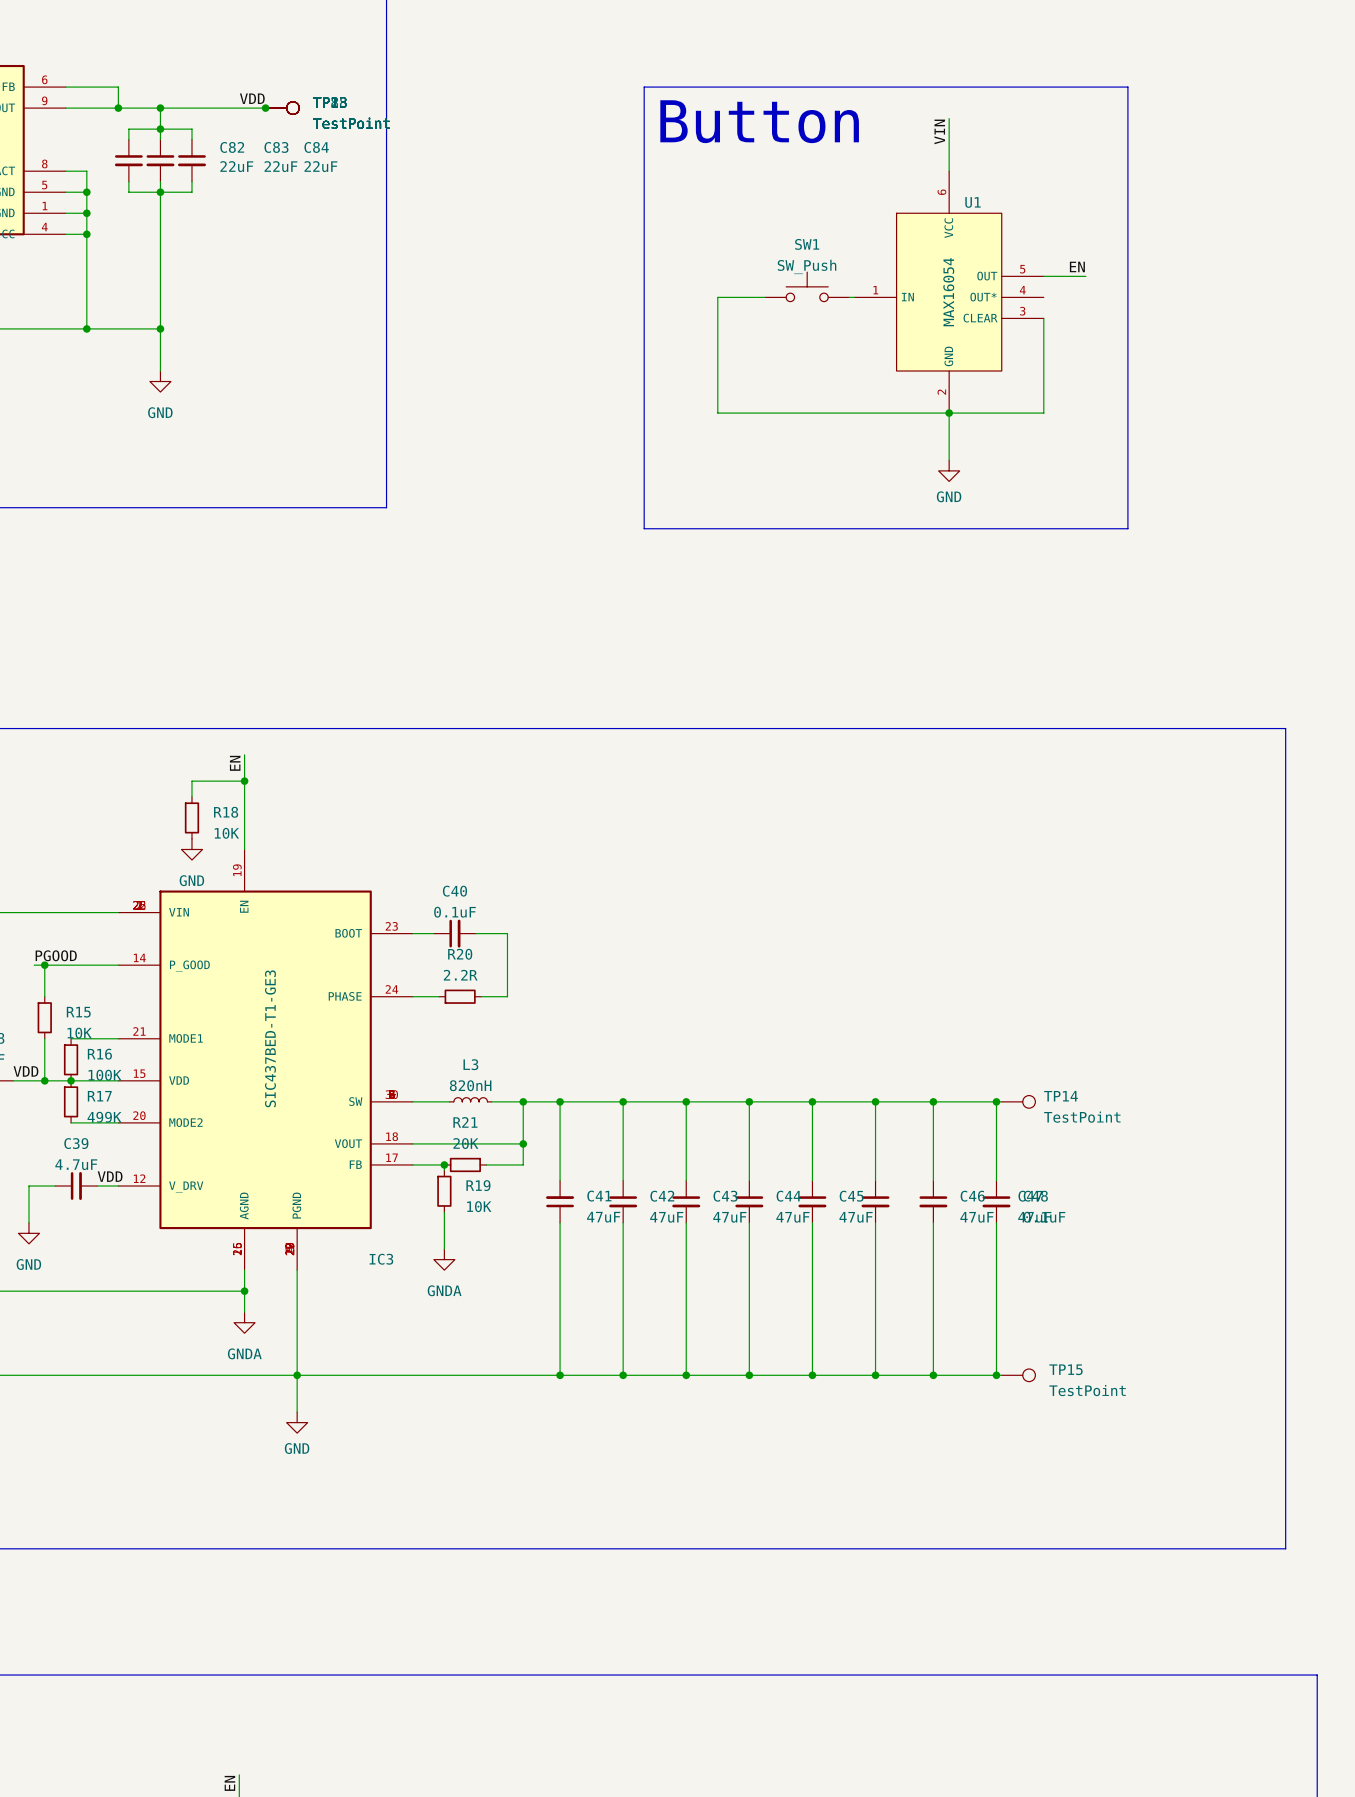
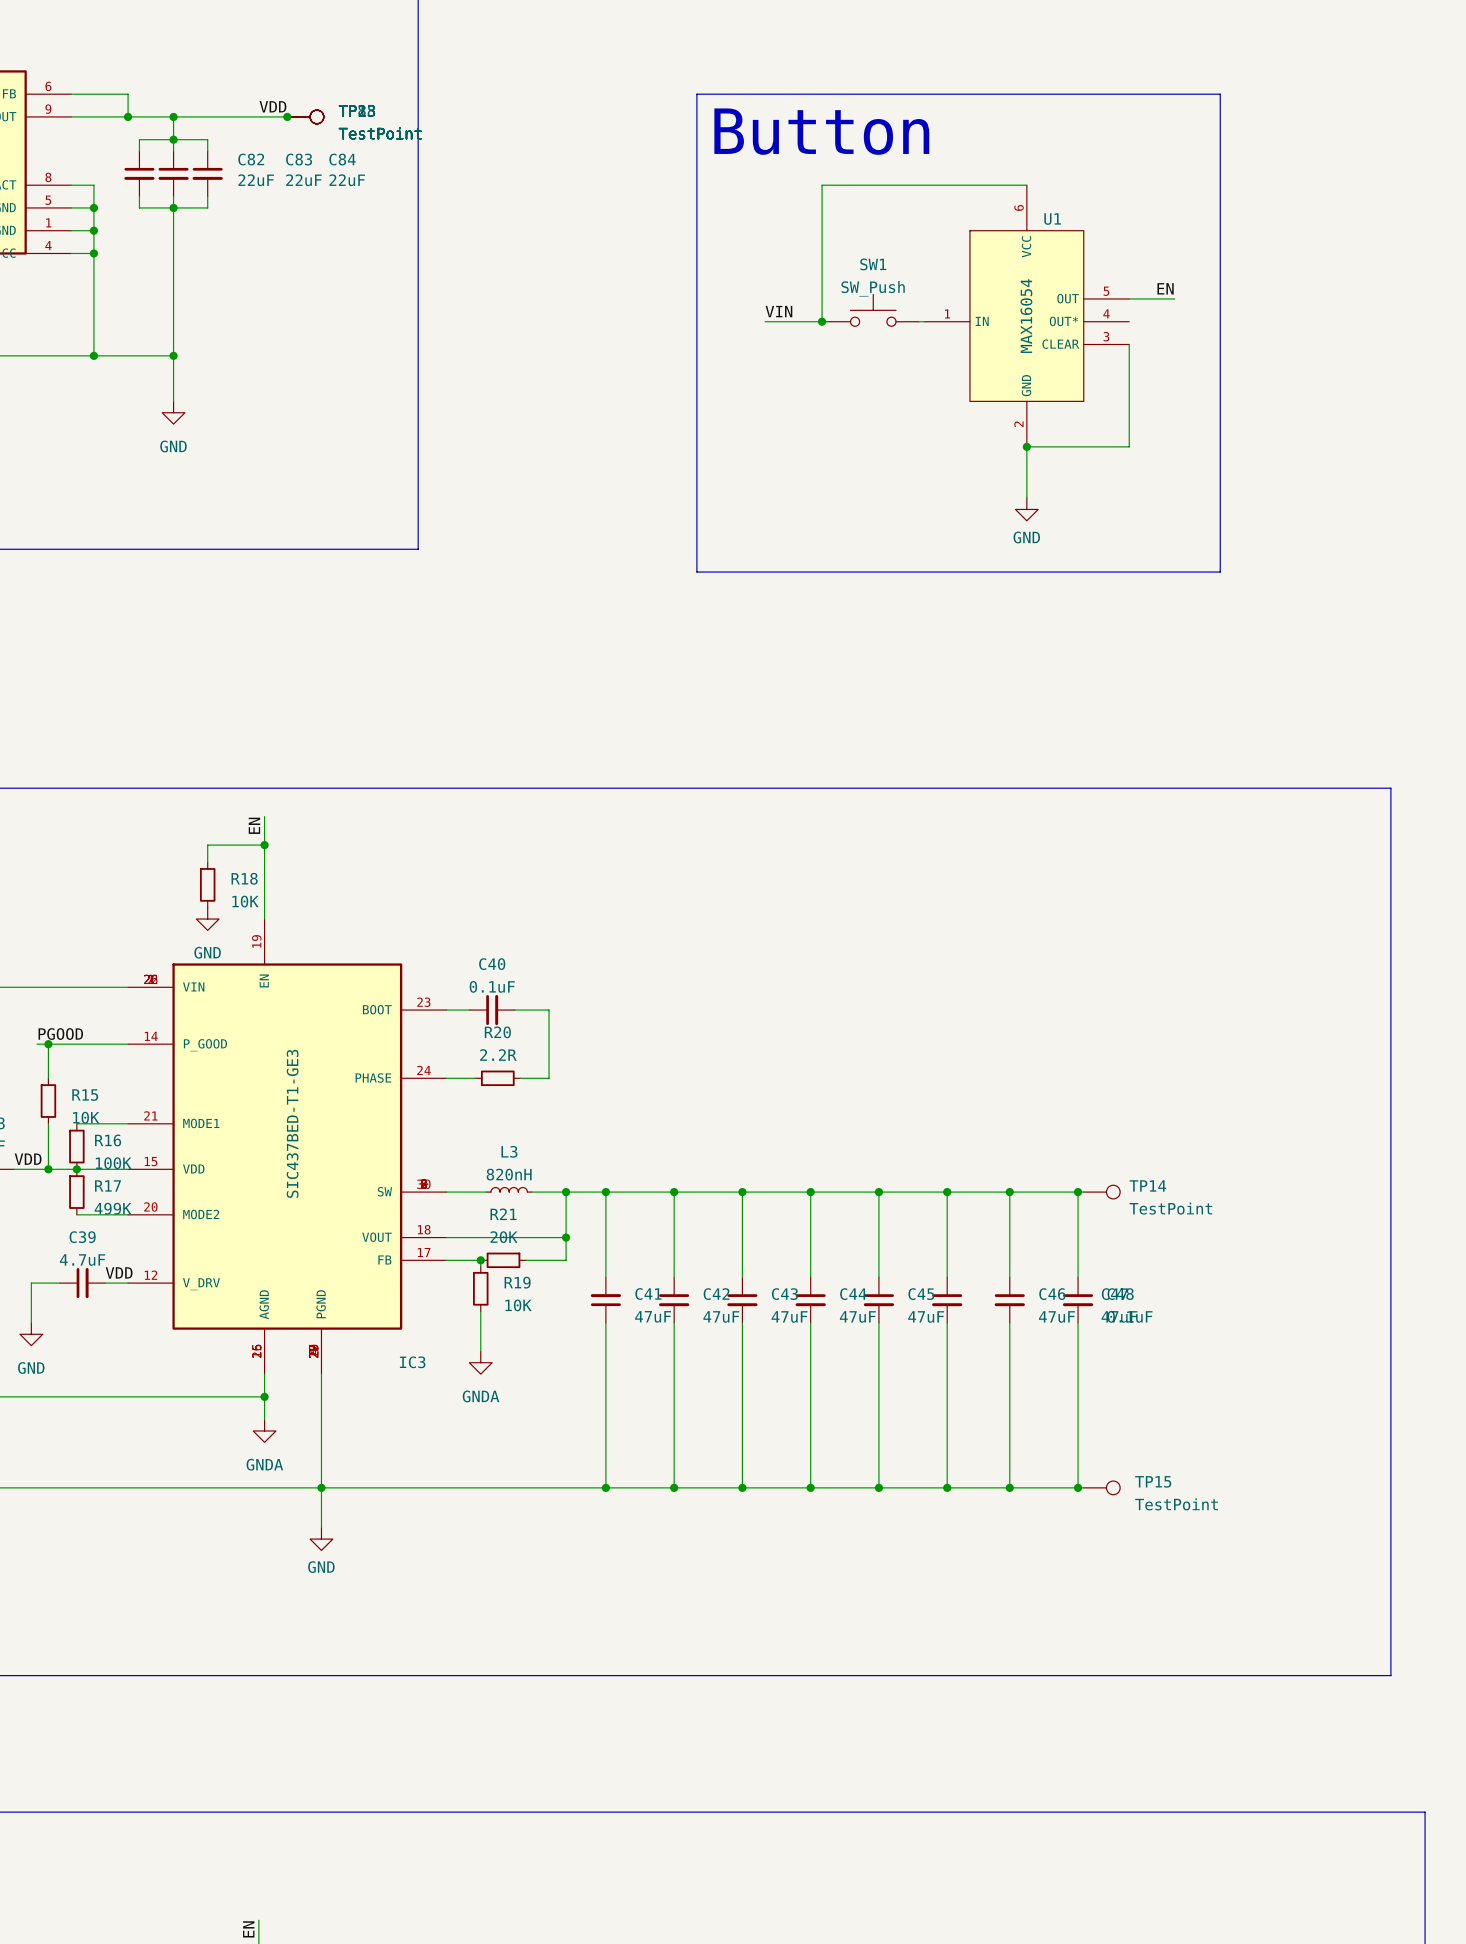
wire: (949, 118) (949, 171) -> (822, 321) (822, 185) (1026, 185)
label: VIN (939, 131) -> none
label: none -> VIN (778, 311)
wire: (717, 297) (717, 413) (949, 413) -> (776, 321) (765, 321)
junction: none -> (822, 321)

